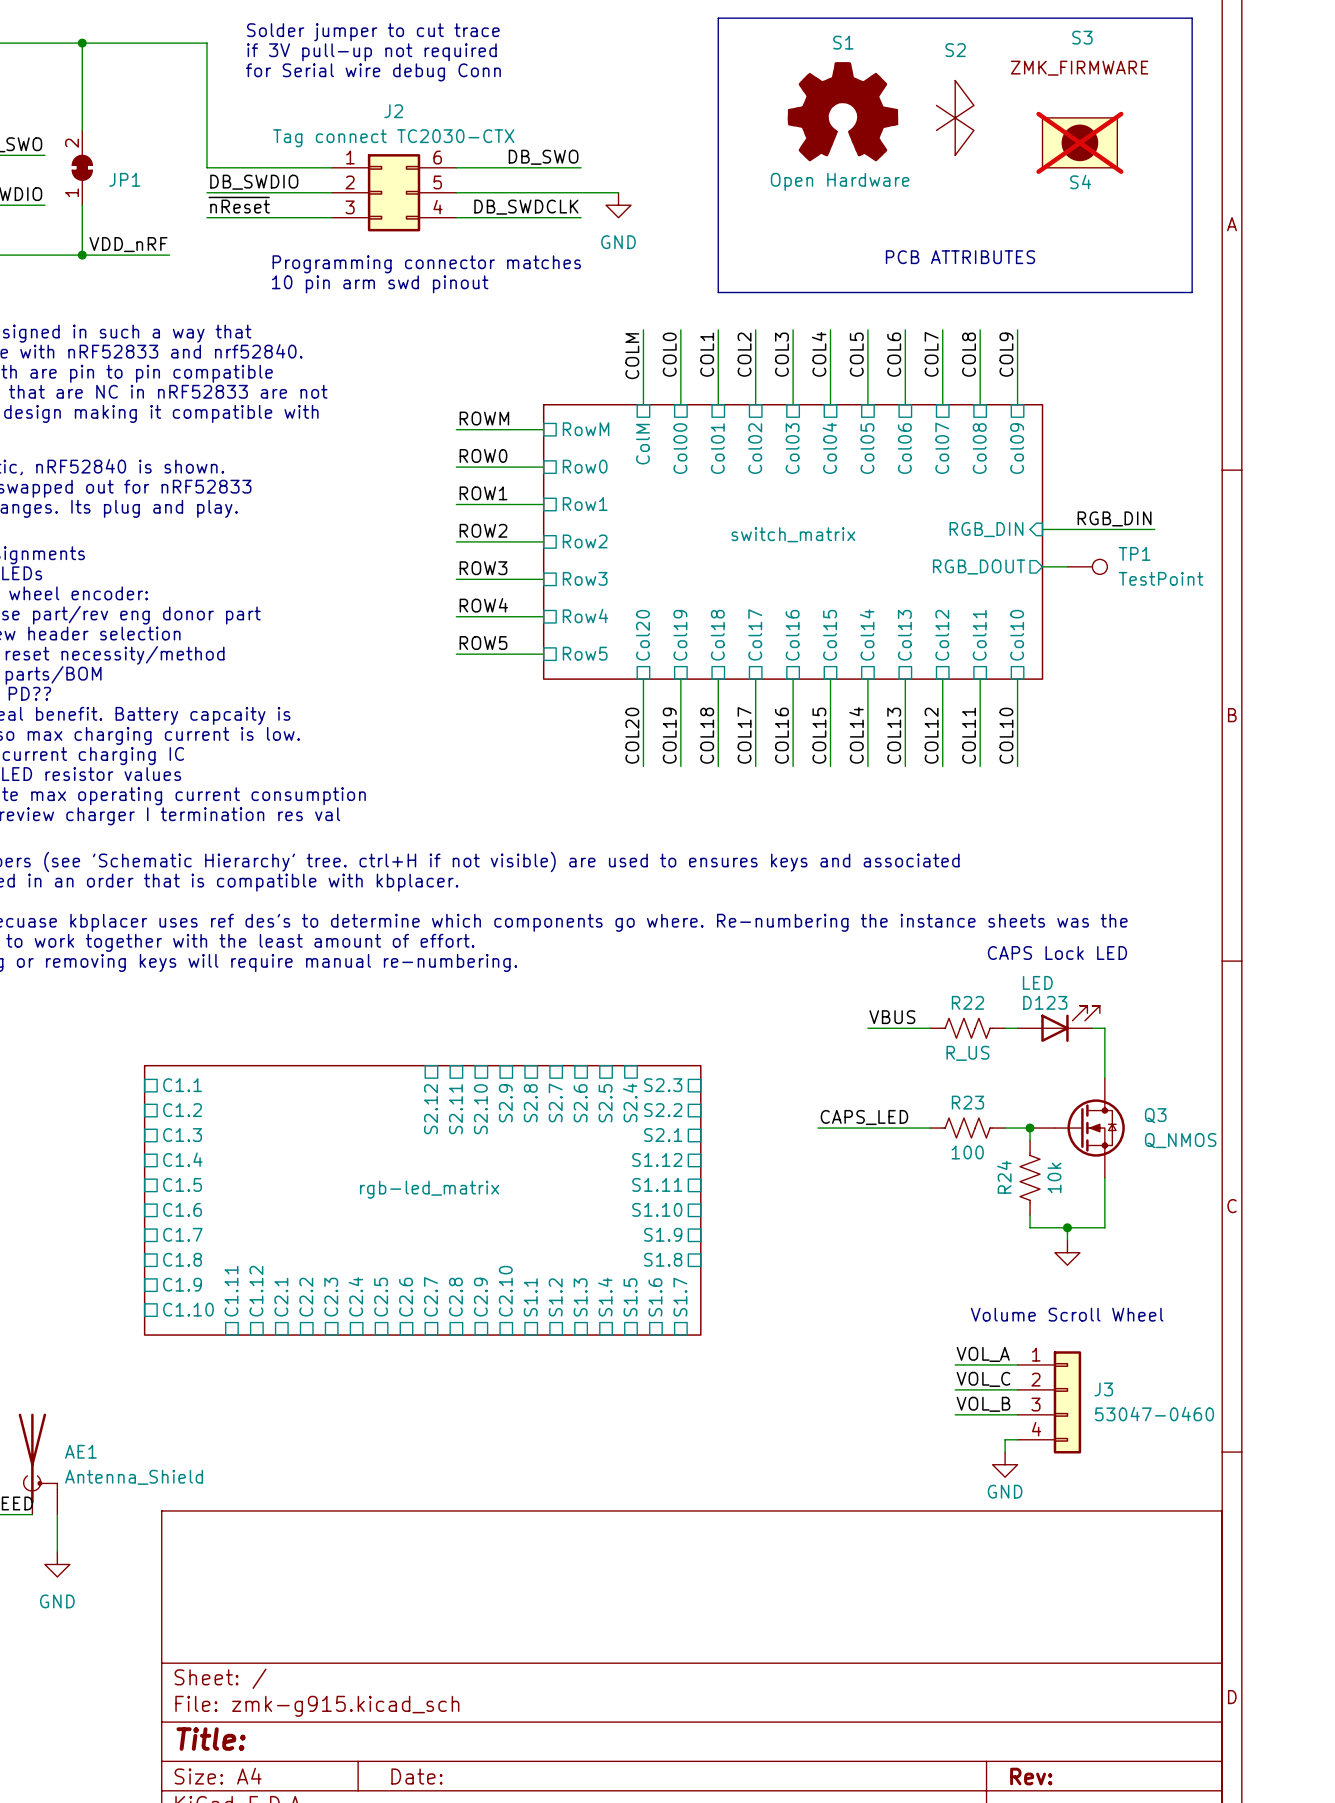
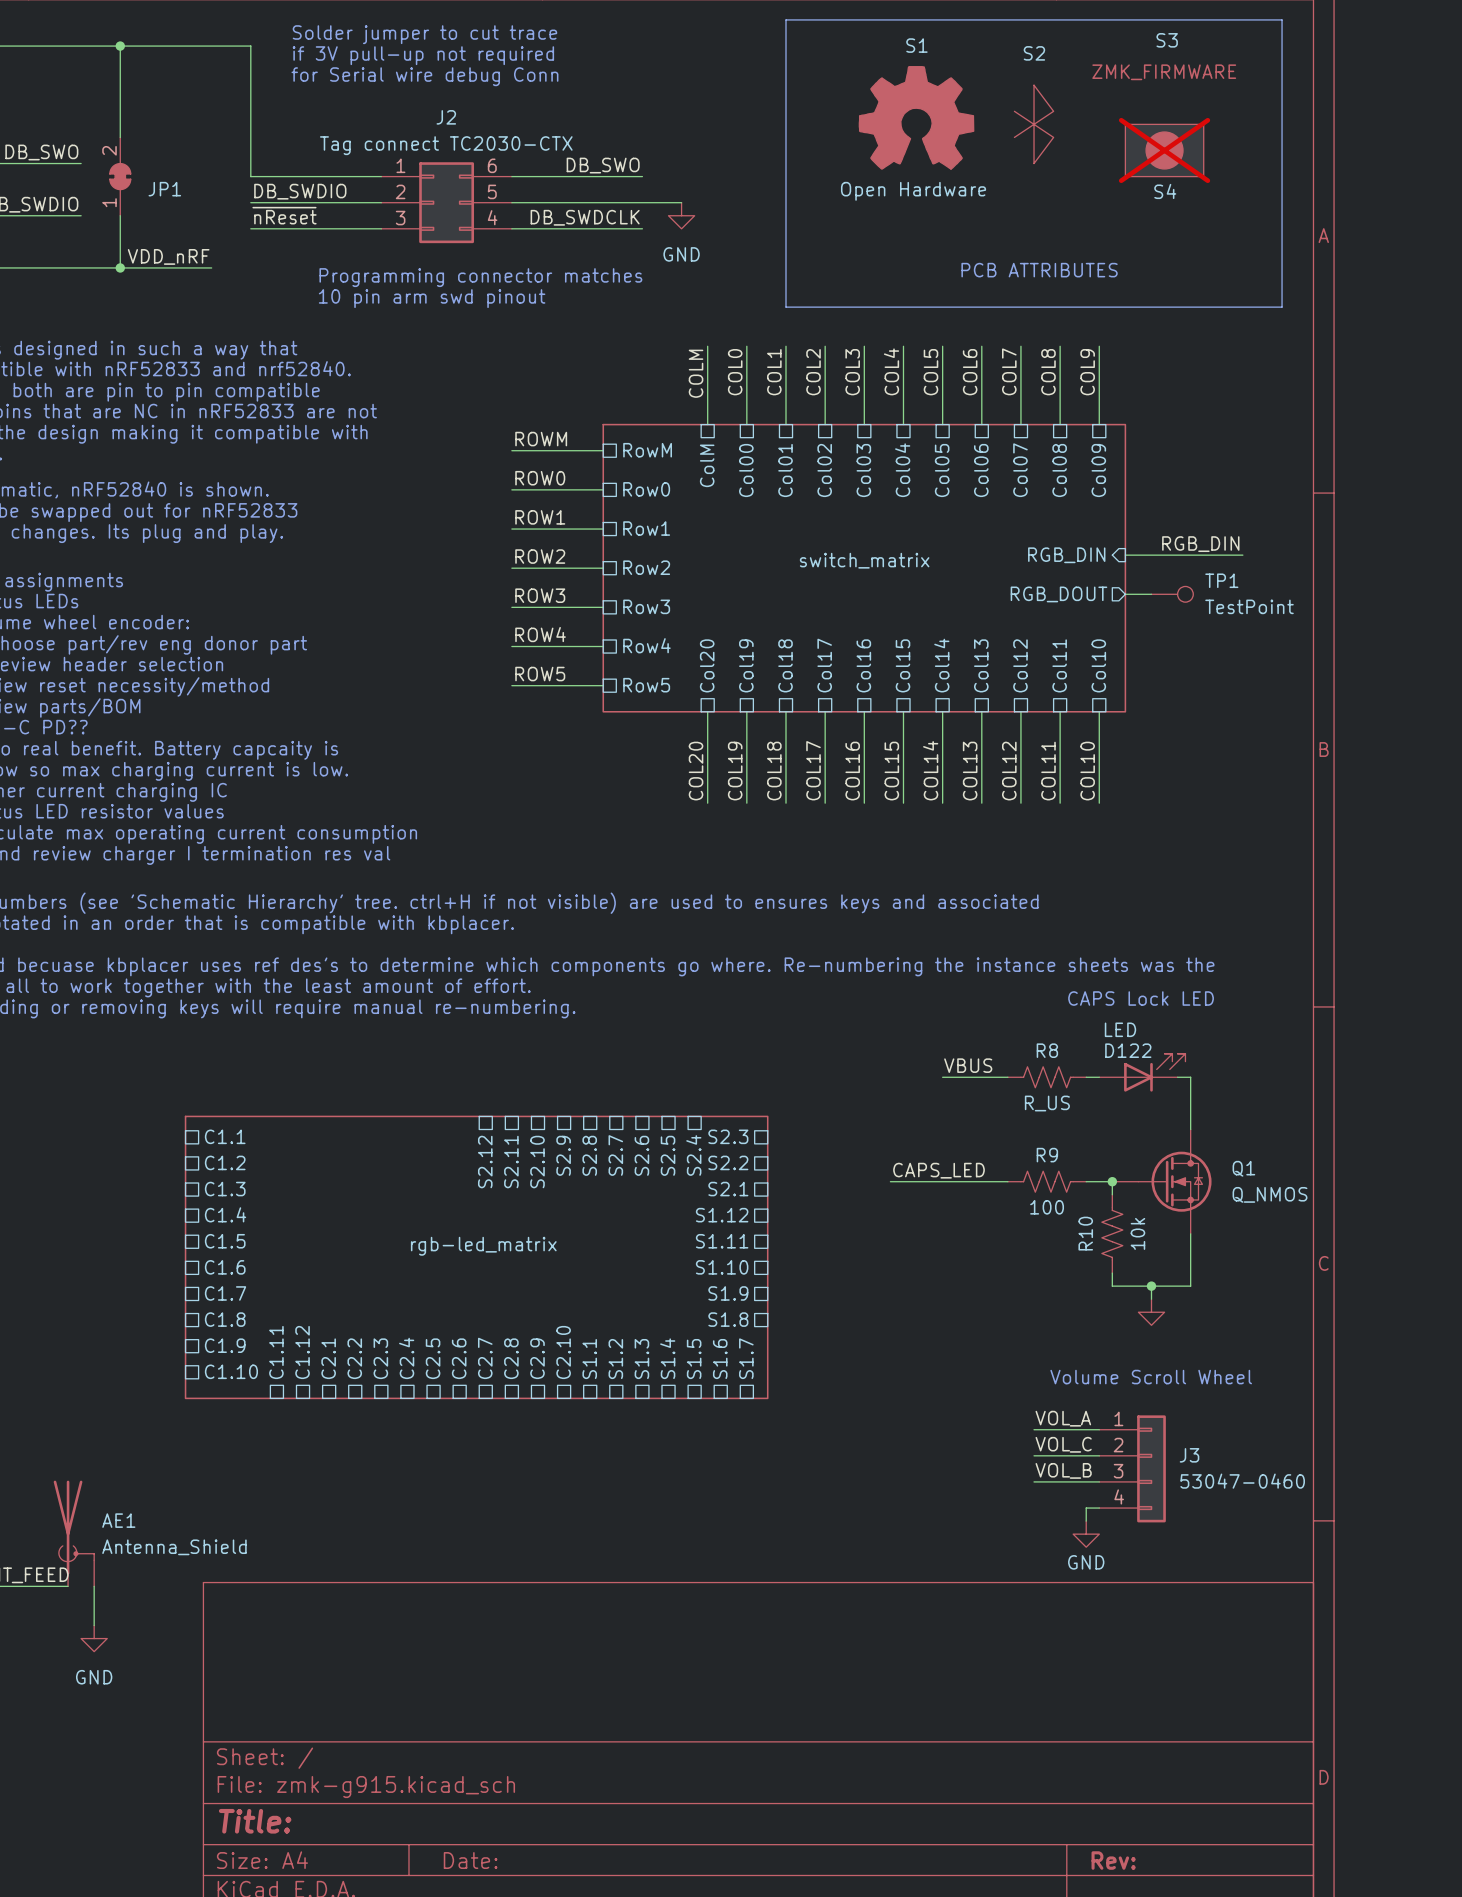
R22 name: R22 (967, 1002) -> R8 (1047, 1050)
D123 name: D123 (1045, 1002) -> D122 (1128, 1050)
R23 name: R23 (967, 1102) -> R9 (1047, 1155)
Q3 name: Q3 (1155, 1115) -> Q1 (1243, 1168)
R24 name: R24 (1004, 1177) -> R10 (1085, 1233)

